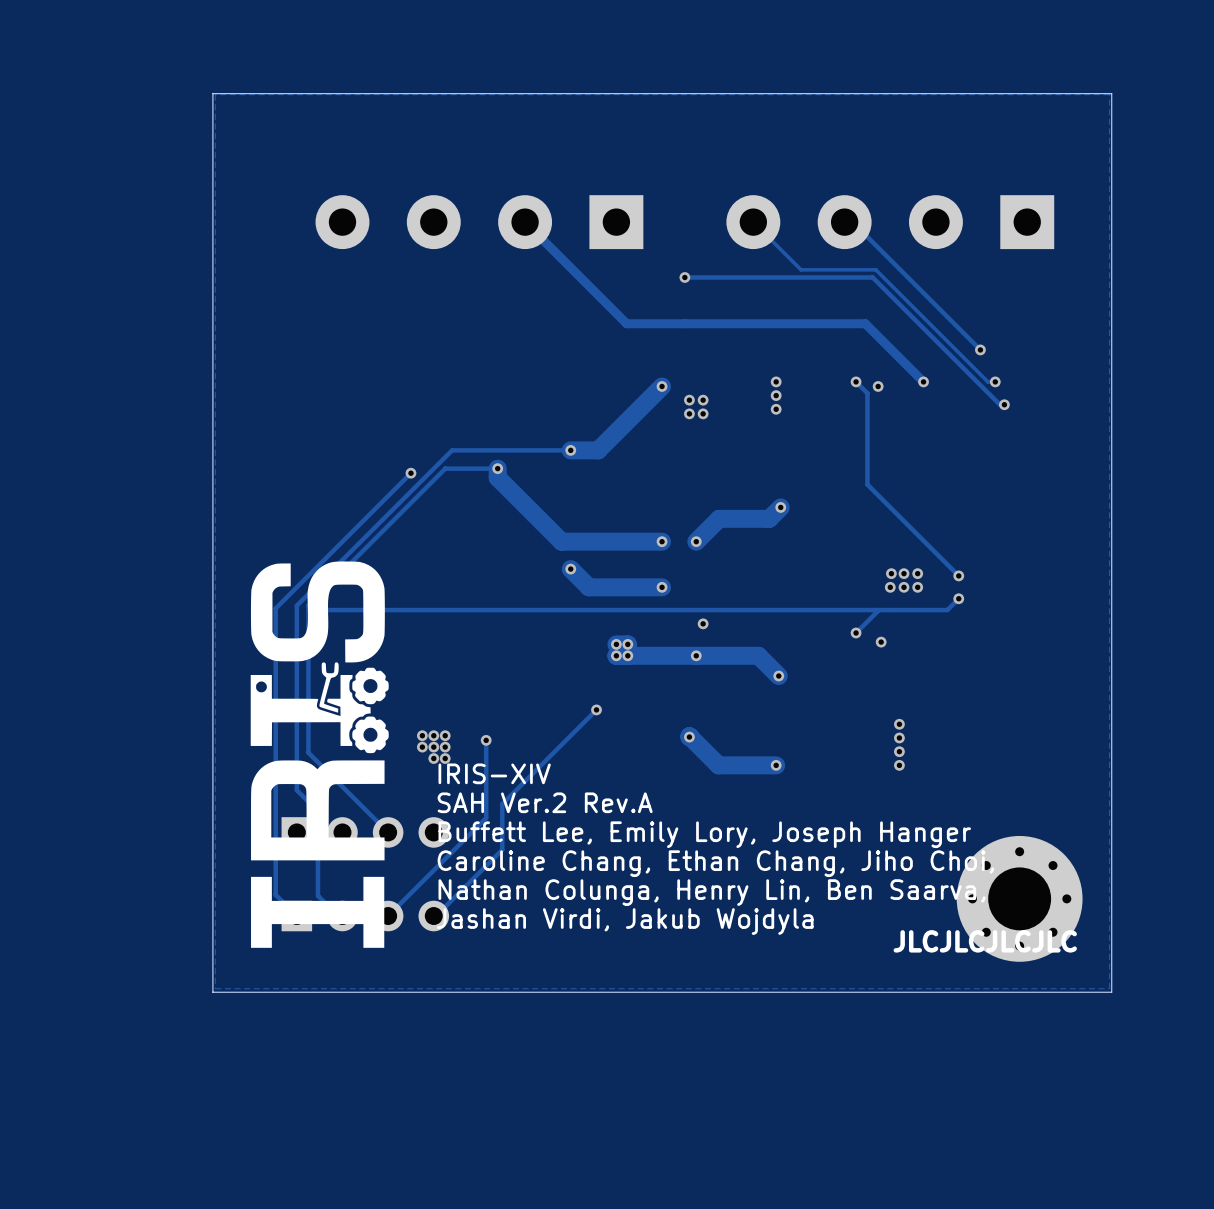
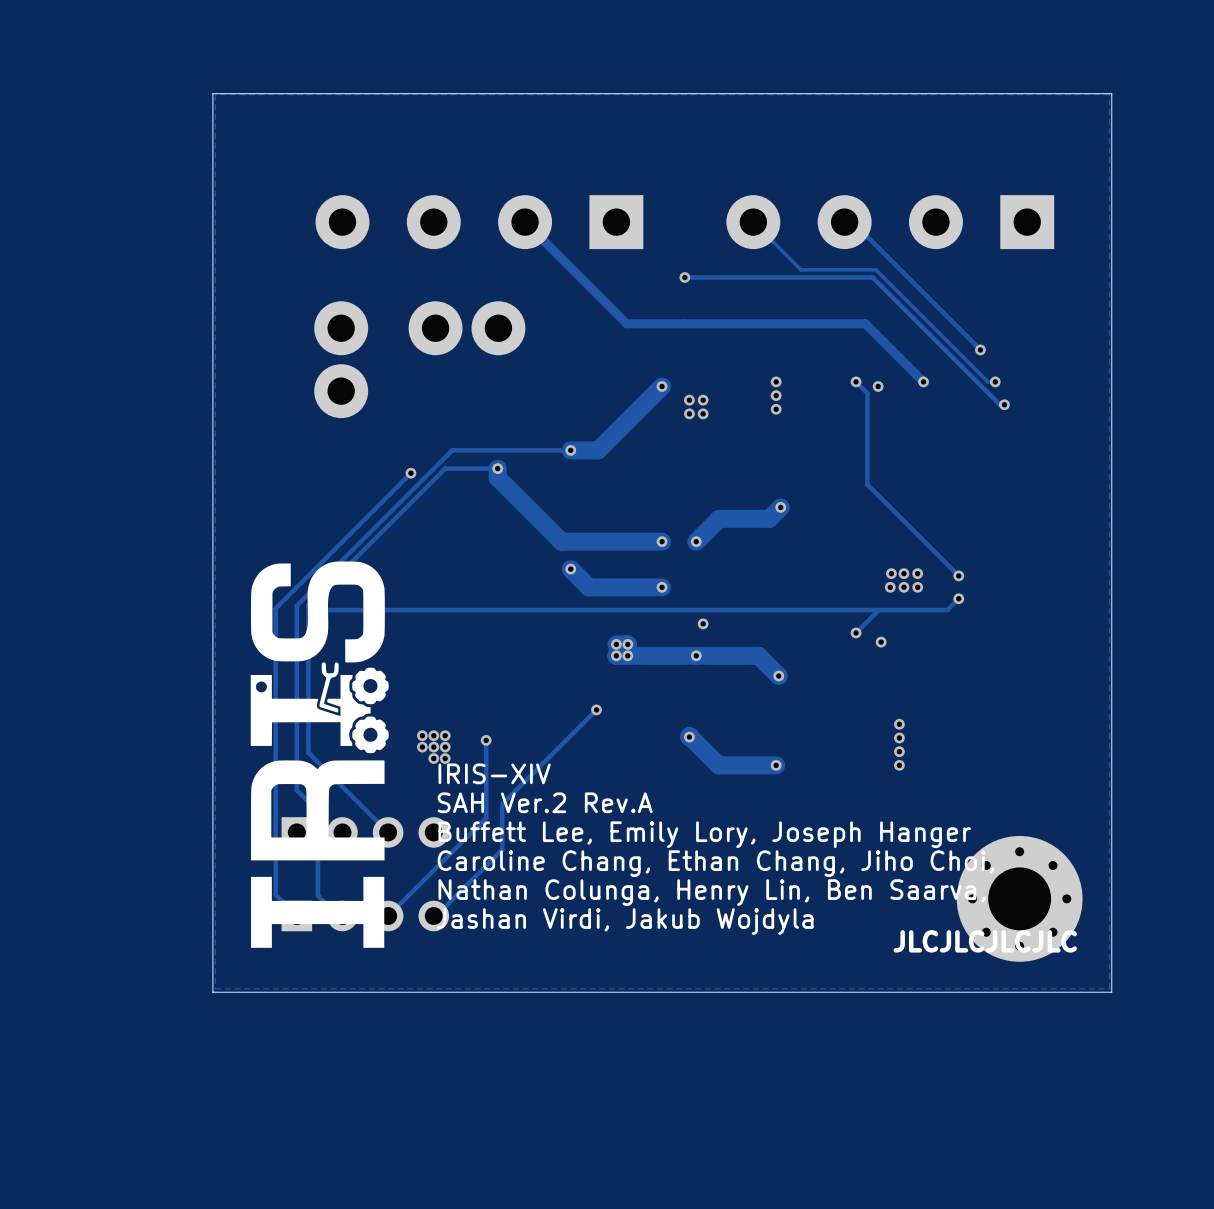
part: none -> (341, 328)
part: none -> (435, 328)
part: none -> (498, 328)
part: none -> (341, 391)

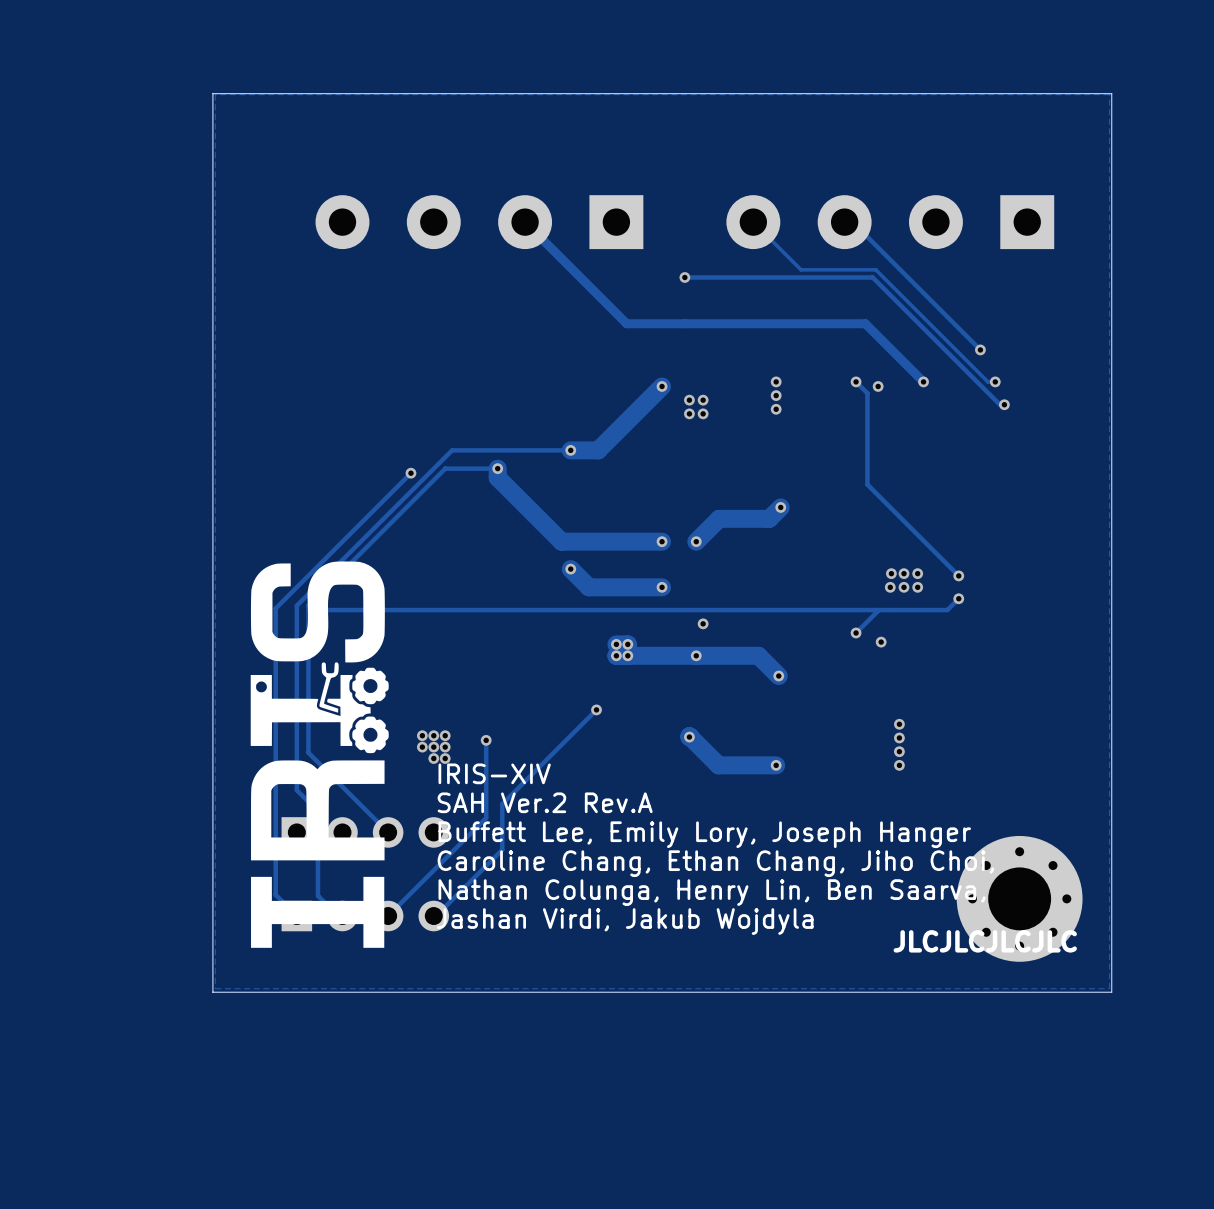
part: (341, 328) -> none
part: (435, 328) -> none
part: (498, 328) -> none
part: (341, 391) -> none

